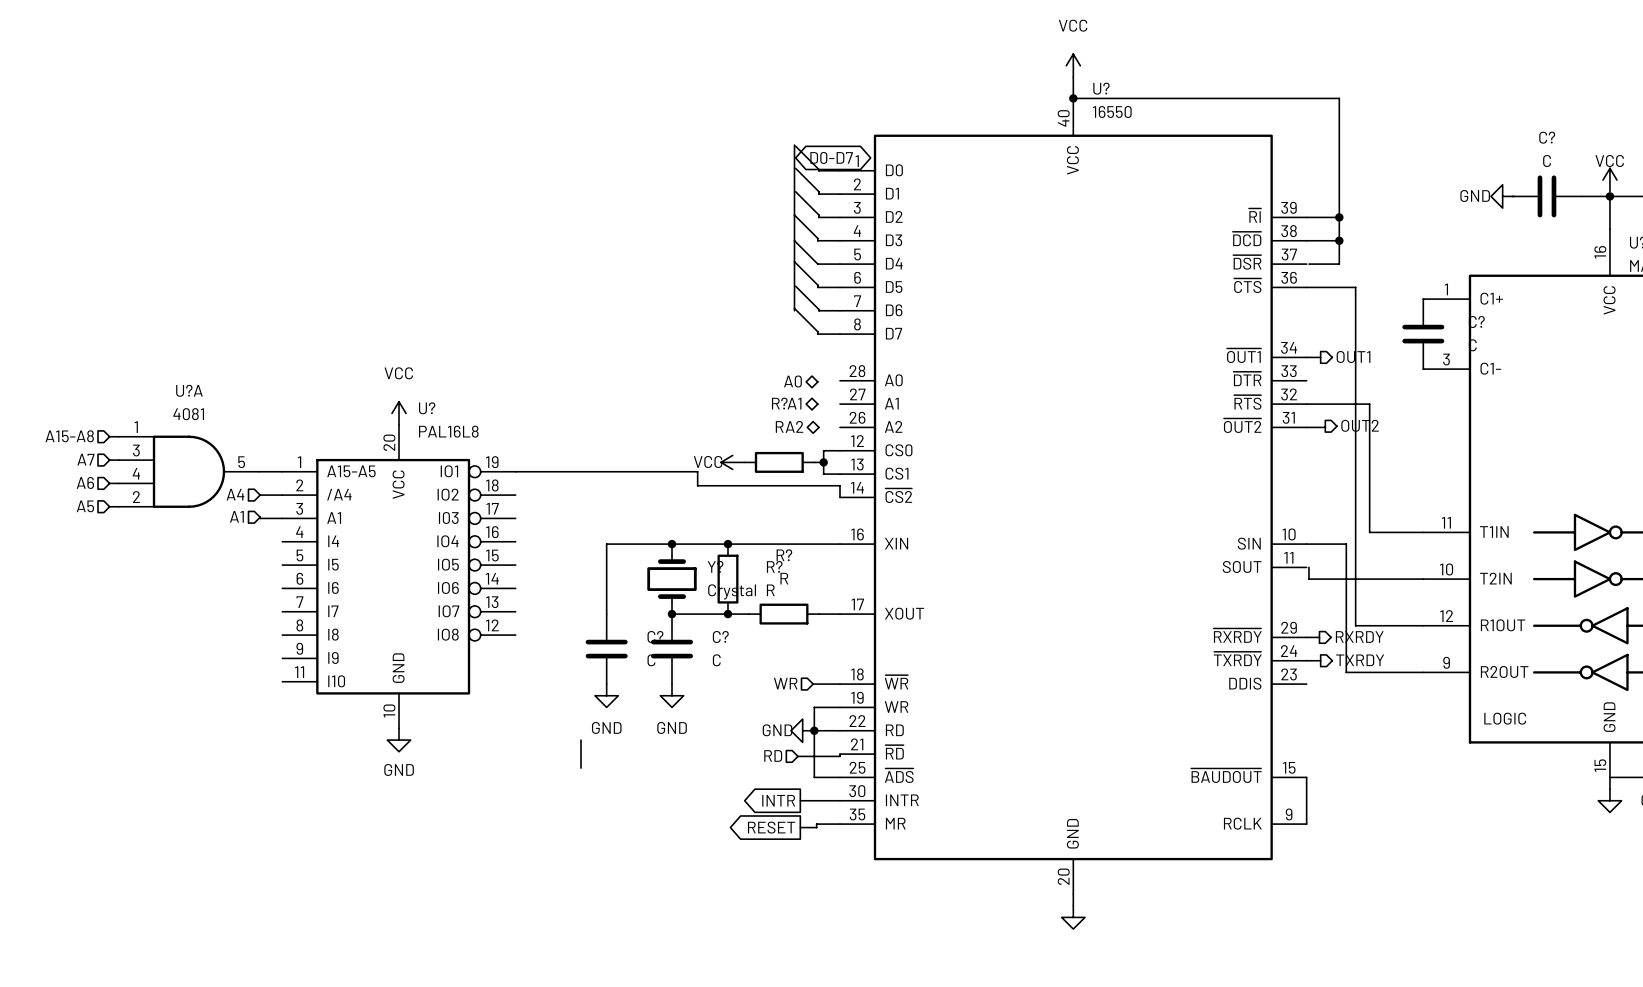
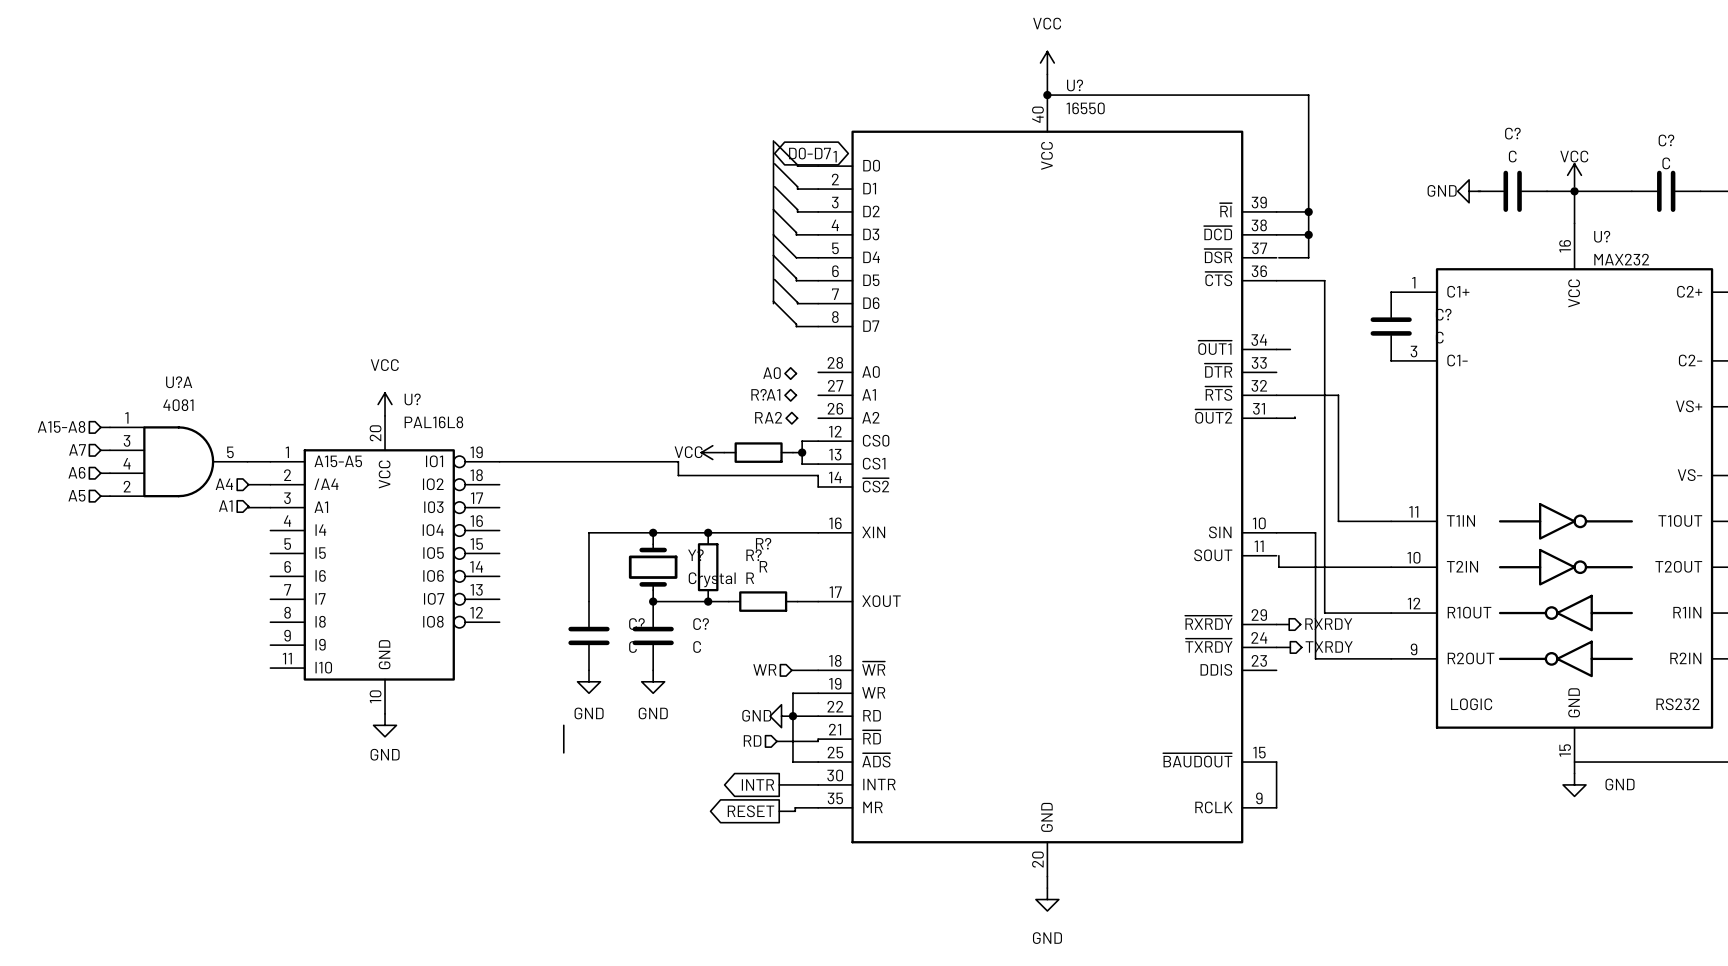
hierarchical label: OUT1 (1353, 356) -> none
hierarchical label: OUT2 (1360, 425) -> none
power symbol text: none -> GND (1047, 938)

